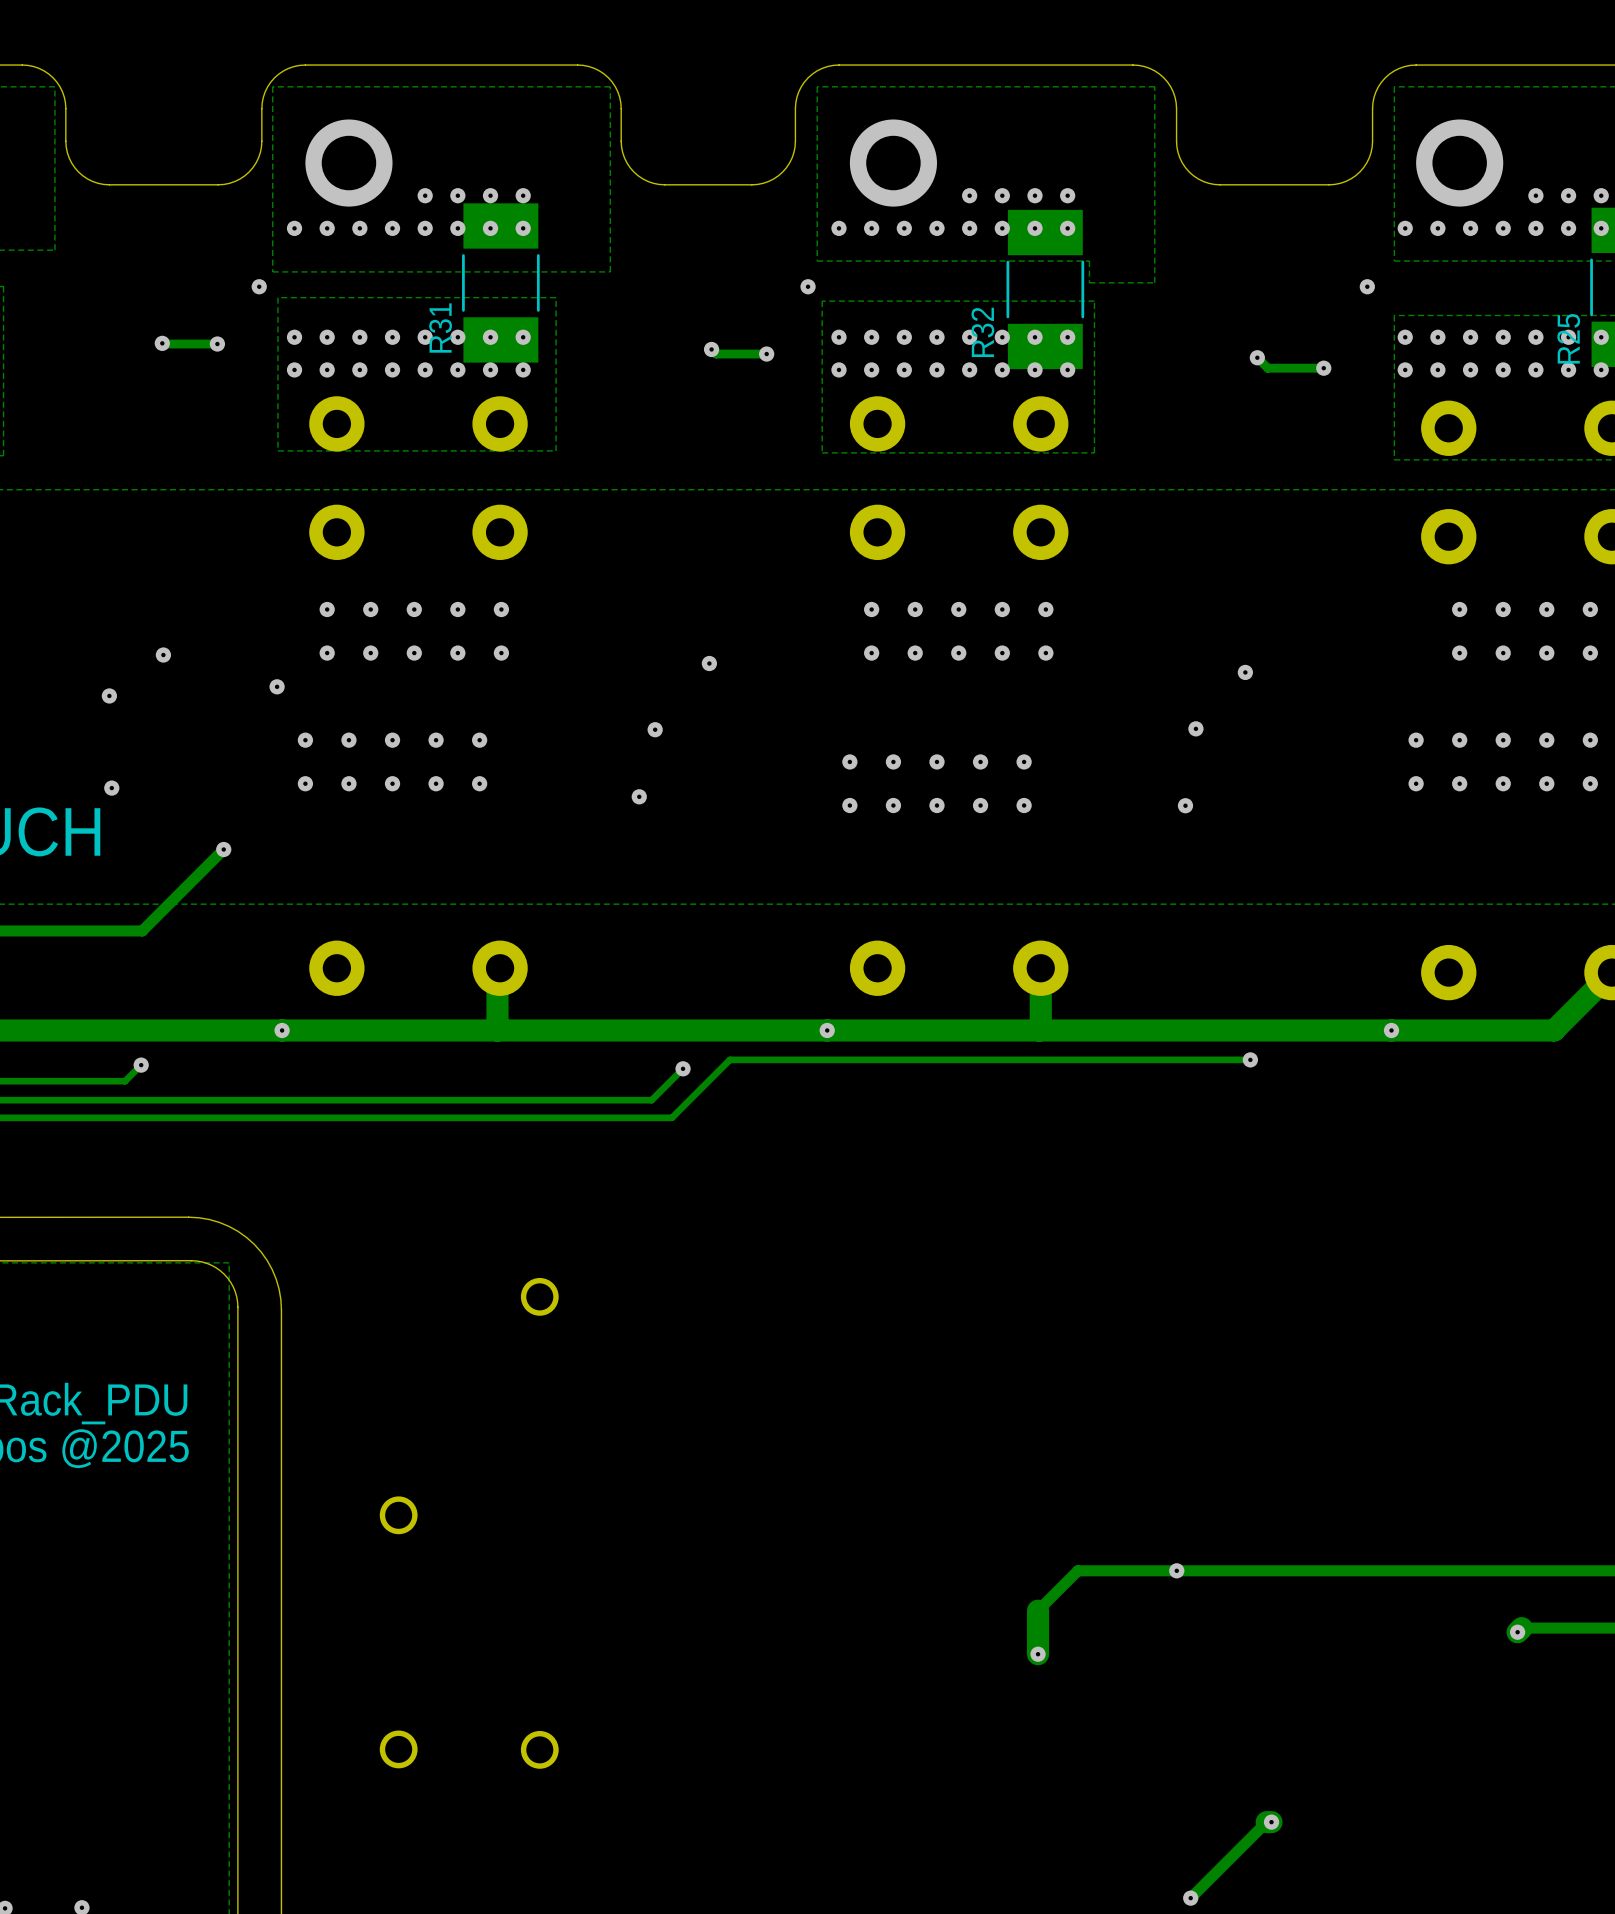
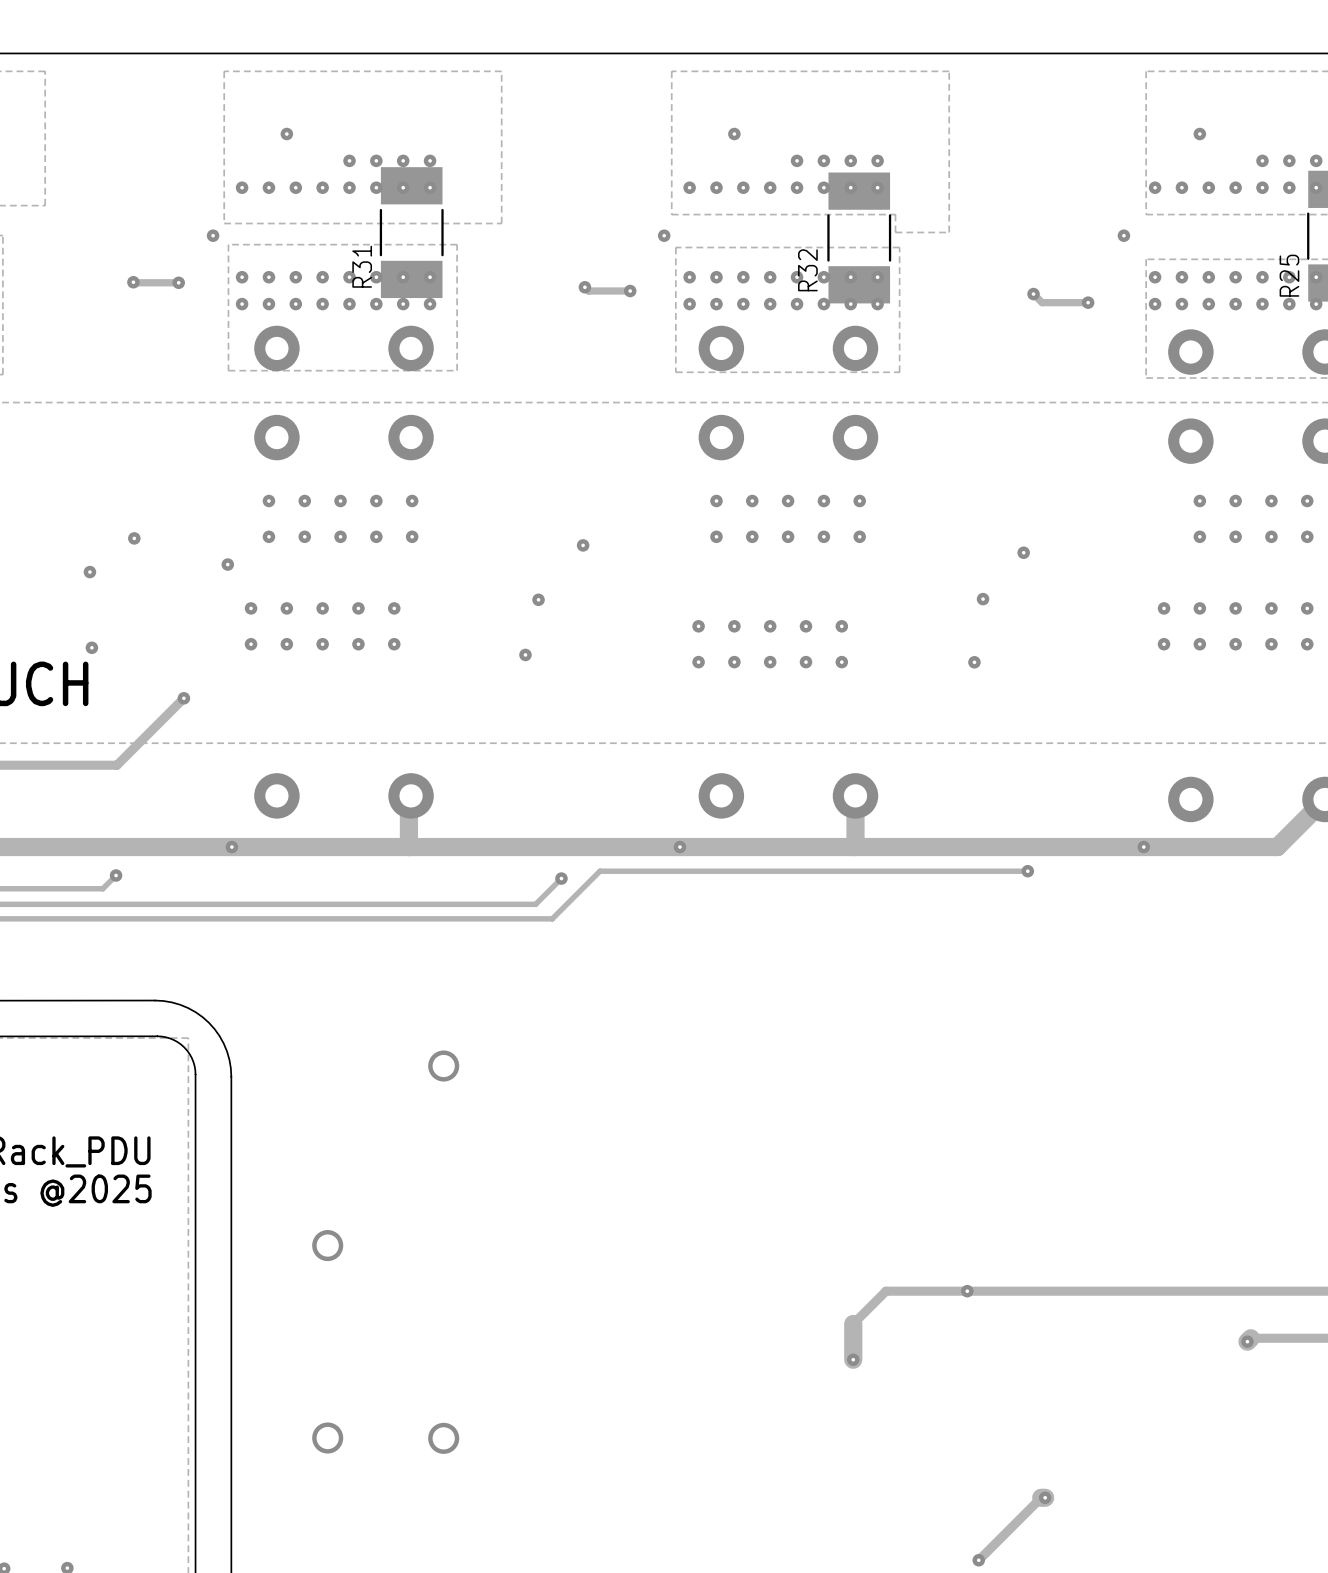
board edge: (305, 65) (288, 68) (270, 82) (262, 102) (261, 146) (256, 163) (240, 178) (218, 184) (109, 184) (87, 178) (74, 167) (67, 152) (65, 102) (60, 86) (44, 70) (22, 65) -> (251, 53) (18, 53)
board edge: (838, 65) (822, 68) (804, 82) (795, 102) (795, 146) (789, 163) (773, 178) (751, 184) (659, 184) (638, 175) (627, 163) (622, 152) (620, 102) (615, 86) (599, 70) (577, 65) -> (689, 53) (474, 53)
board edge: (1416, 65) (1399, 68) (1381, 82) (1372, 102) (1372, 146) (1366, 163) (1350, 178) (1329, 184) (1220, 184) (1198, 178) (1185, 167) (1178, 152) (1176, 102) (1170, 86) (1154, 70) (1132, 65) -> (1164, 53) (931, 53)
via size: [305, 119, 393, 207] -> [280, 127, 294, 141]
via size: [849, 119, 937, 207] -> [728, 127, 741, 141]
via size: [1416, 119, 1504, 207] -> [1193, 127, 1207, 141]

